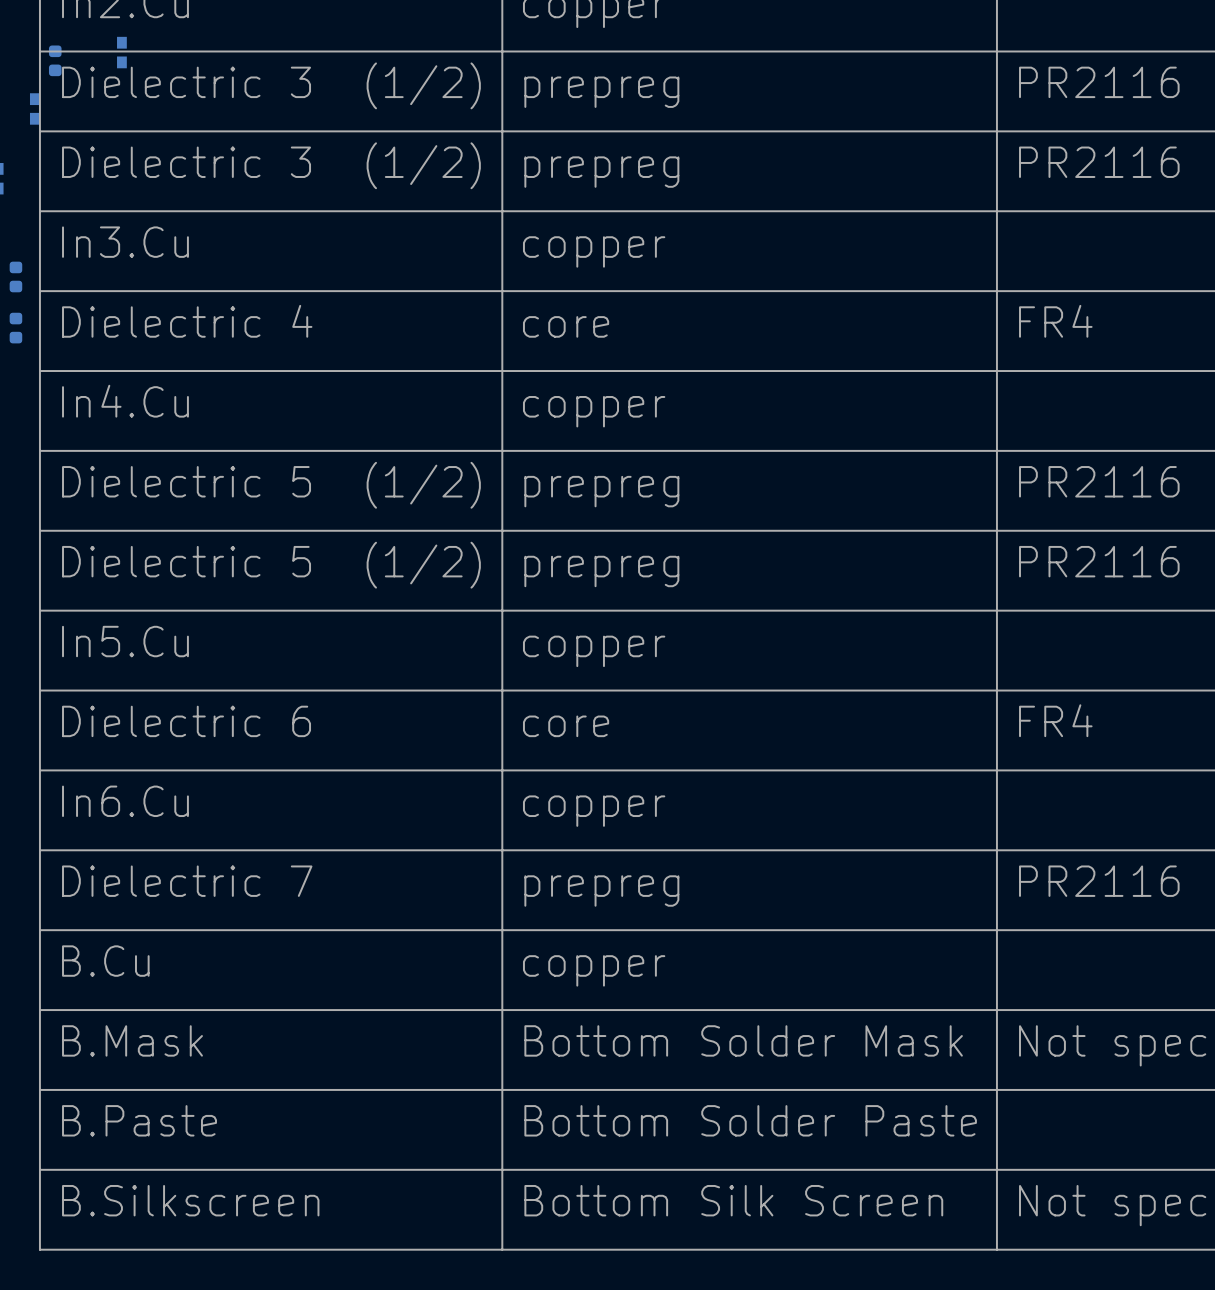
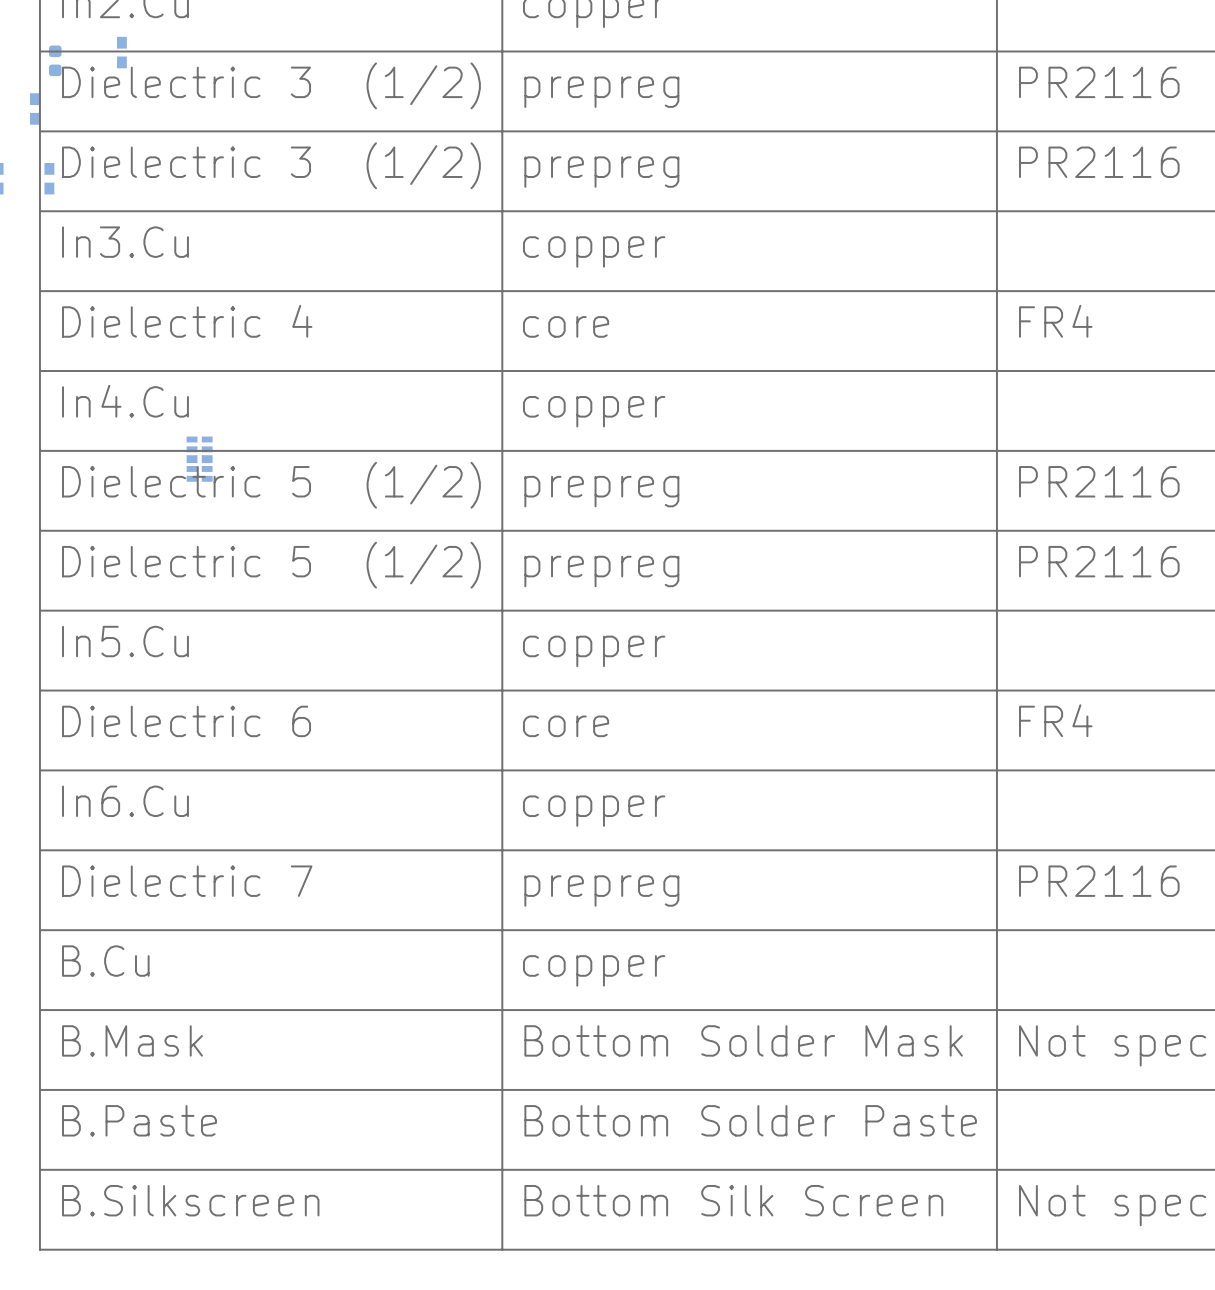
part: none -> (49, 178)
part: (15, 276) -> none
part: (15, 328) -> none
part: none -> (199, 459)

